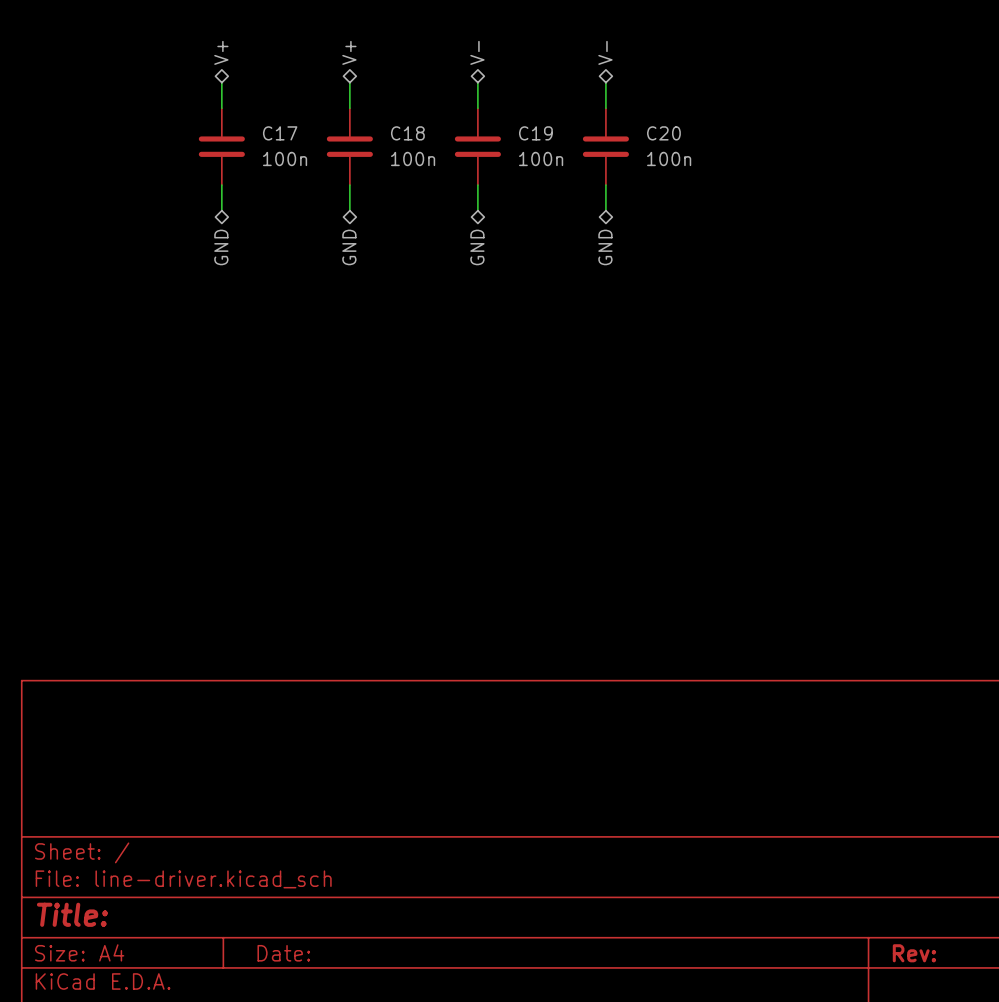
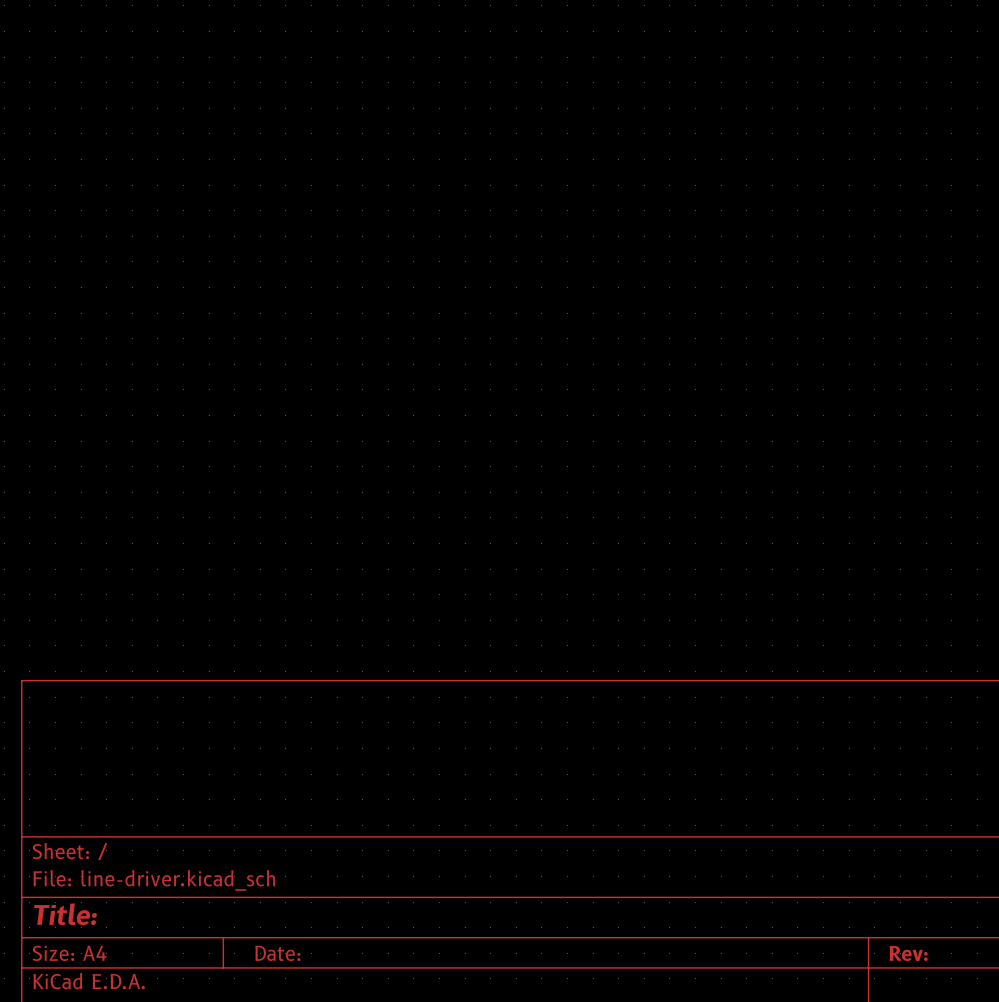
hierarchical label: V+ (221, 52) -> none
hierarchical label: V+ (349, 52) -> none
hierarchical label: V- (477, 52) -> none
hierarchical label: V- (605, 52) -> none
wire: (221, 82) (221, 108) -> none
wire: (349, 82) (349, 108) -> none
wire: (477, 82) (477, 108) -> none
wire: (605, 82) (605, 108) -> none
C17: 100n (221, 146) -> none
C18: 100n (349, 146) -> none
C19: 100n (477, 146) -> none
C20: 100n (605, 146) -> none
wire: (221, 185) (221, 210) -> none
wire: (349, 185) (349, 210) -> none
wire: (477, 185) (477, 210) -> none
wire: (605, 185) (605, 210) -> none
hierarchical label: GND (221, 247) -> none
hierarchical label: GND (349, 247) -> none
hierarchical label: GND (477, 247) -> none
hierarchical label: GND (605, 247) -> none

